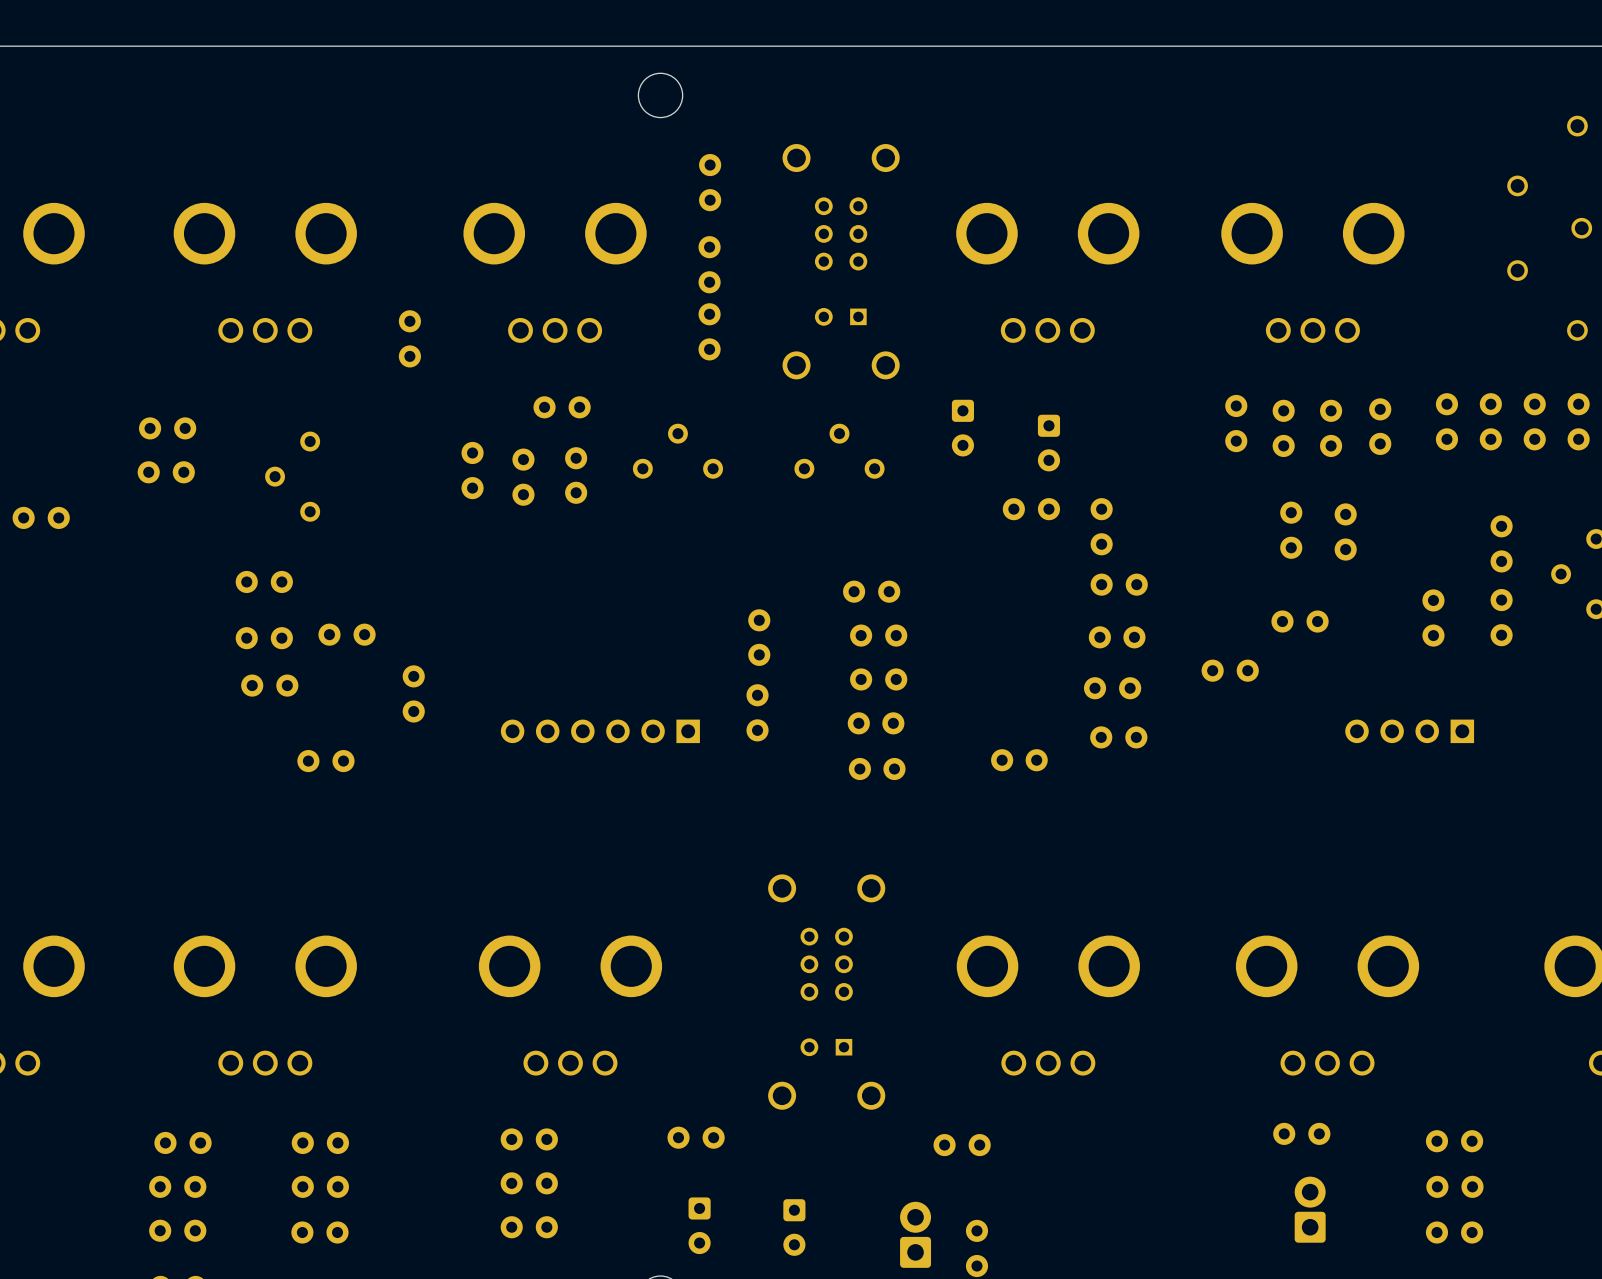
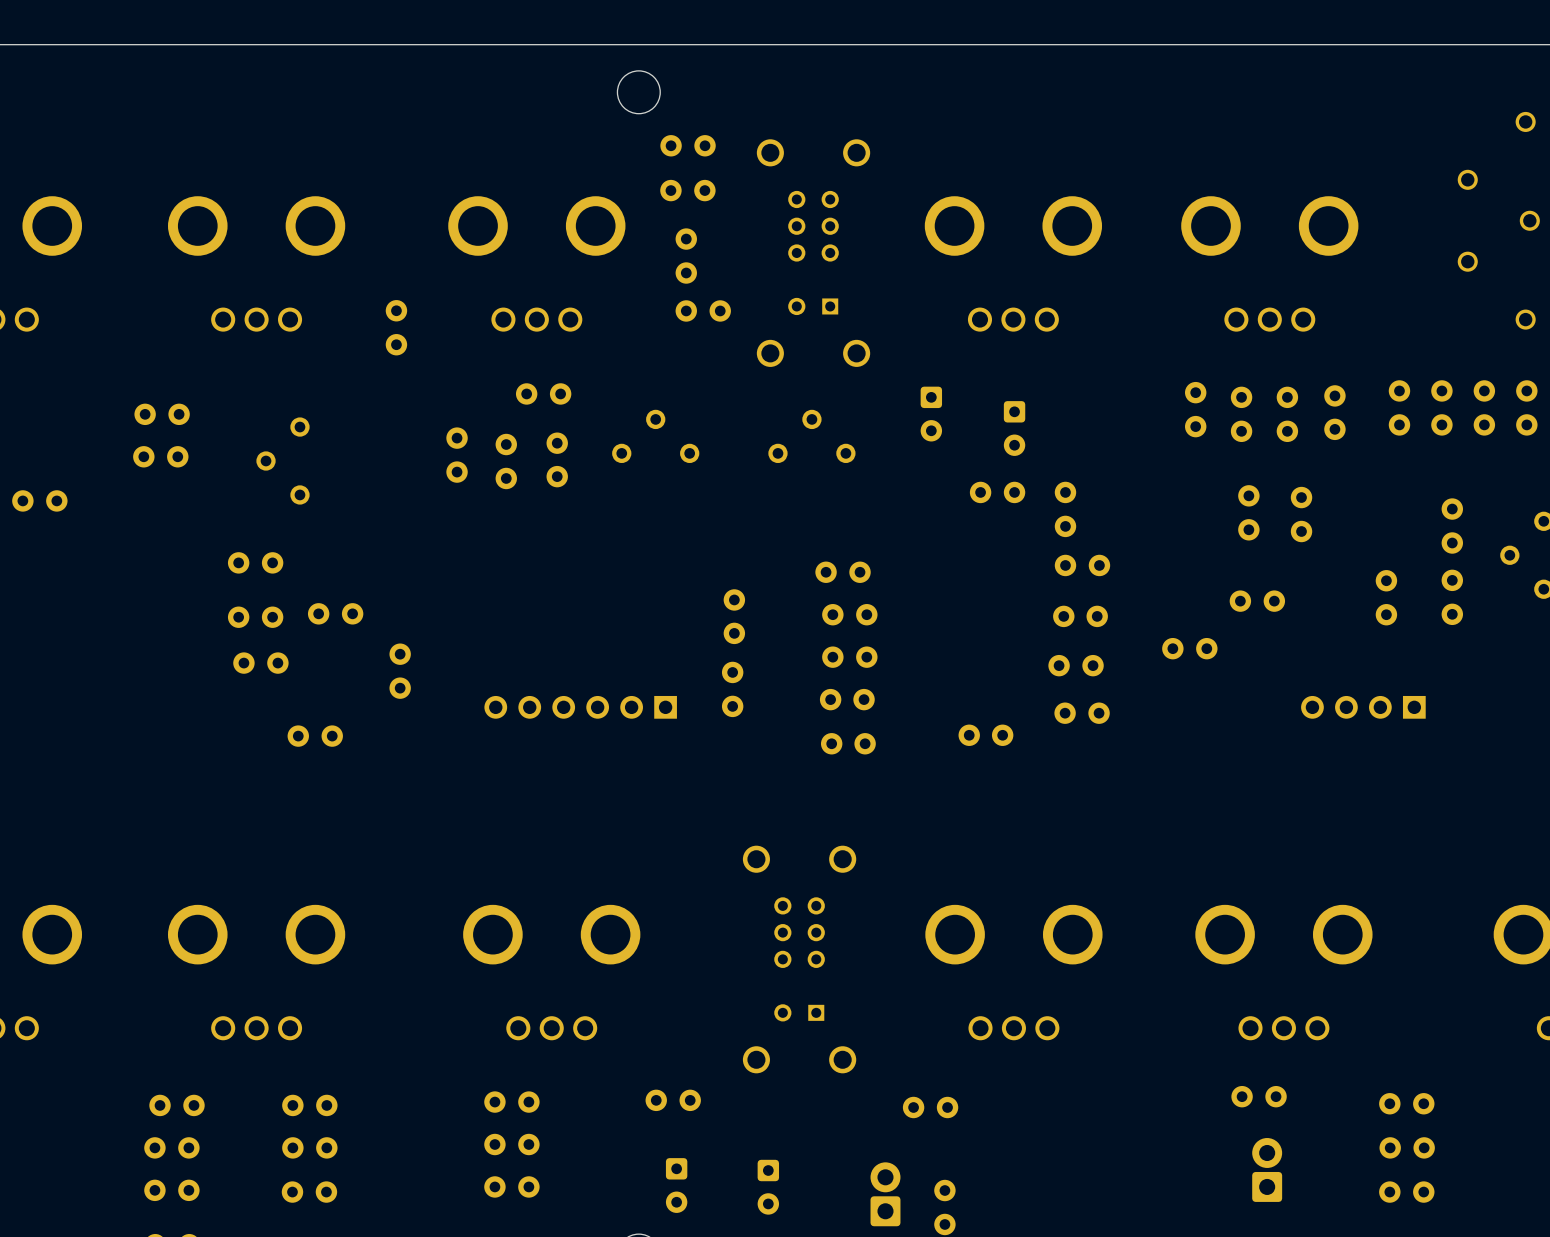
part: none -> (688, 145)
part rotation: 0° (710, 182) -> 90° clockwise (687, 190)
part rotation: 0° (709, 331) -> 90° clockwise (703, 310)

